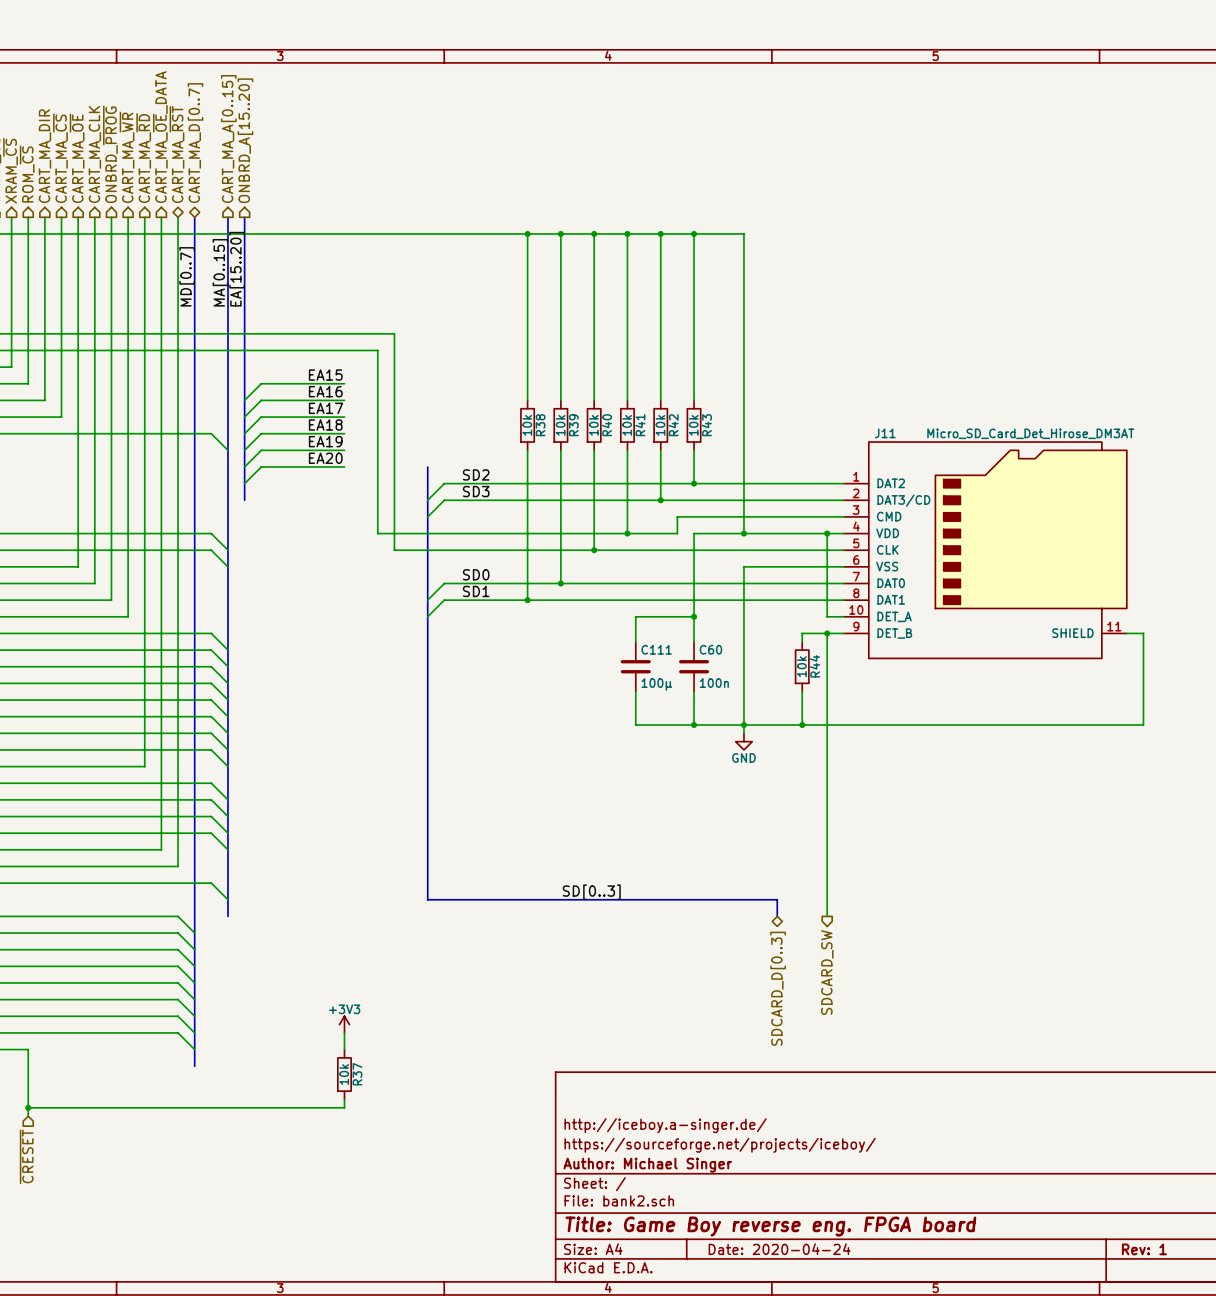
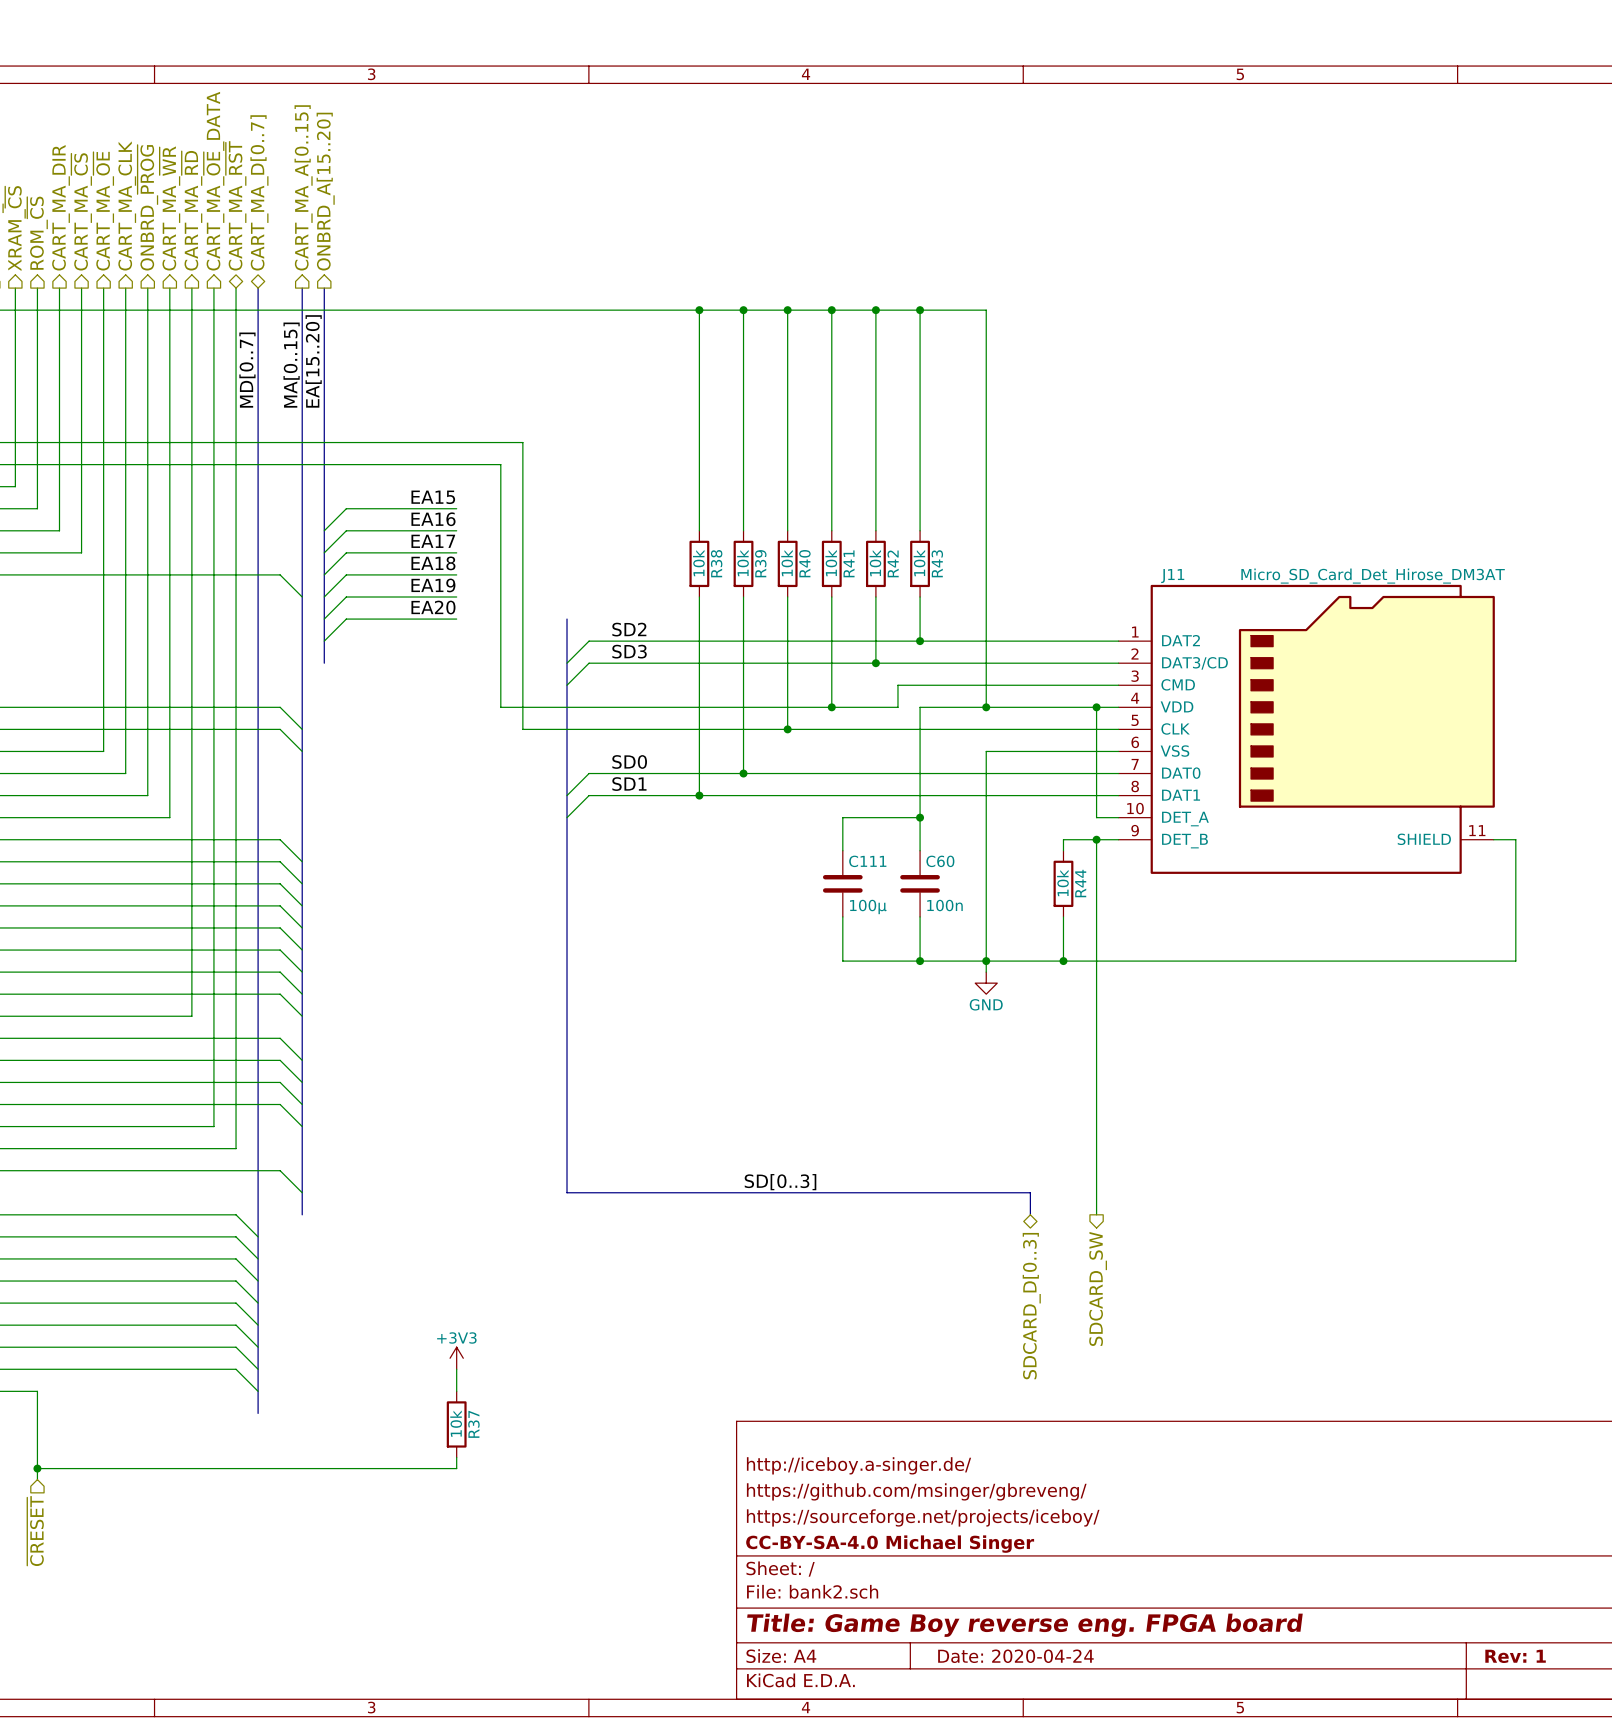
title block: none -> http://iceboy.a-singer.de/ (859, 1465)
title block: http://iceboy.a-singer.de/ (665, 1125) -> https://github.com/msinger/gbreveng/ (916, 1491)
title block: Author: Michael Singer (647, 1165) -> CC-BY-SA-4.0 Michael Singer (890, 1544)

